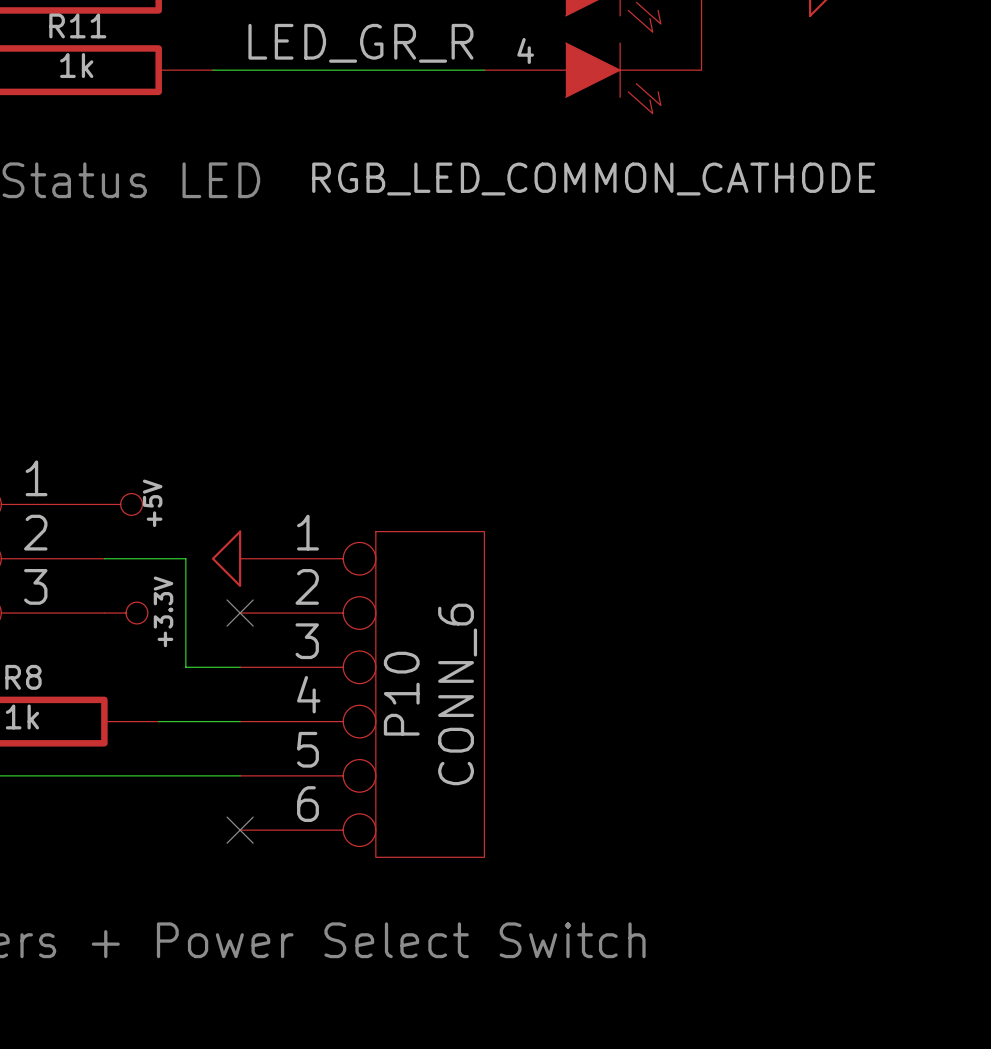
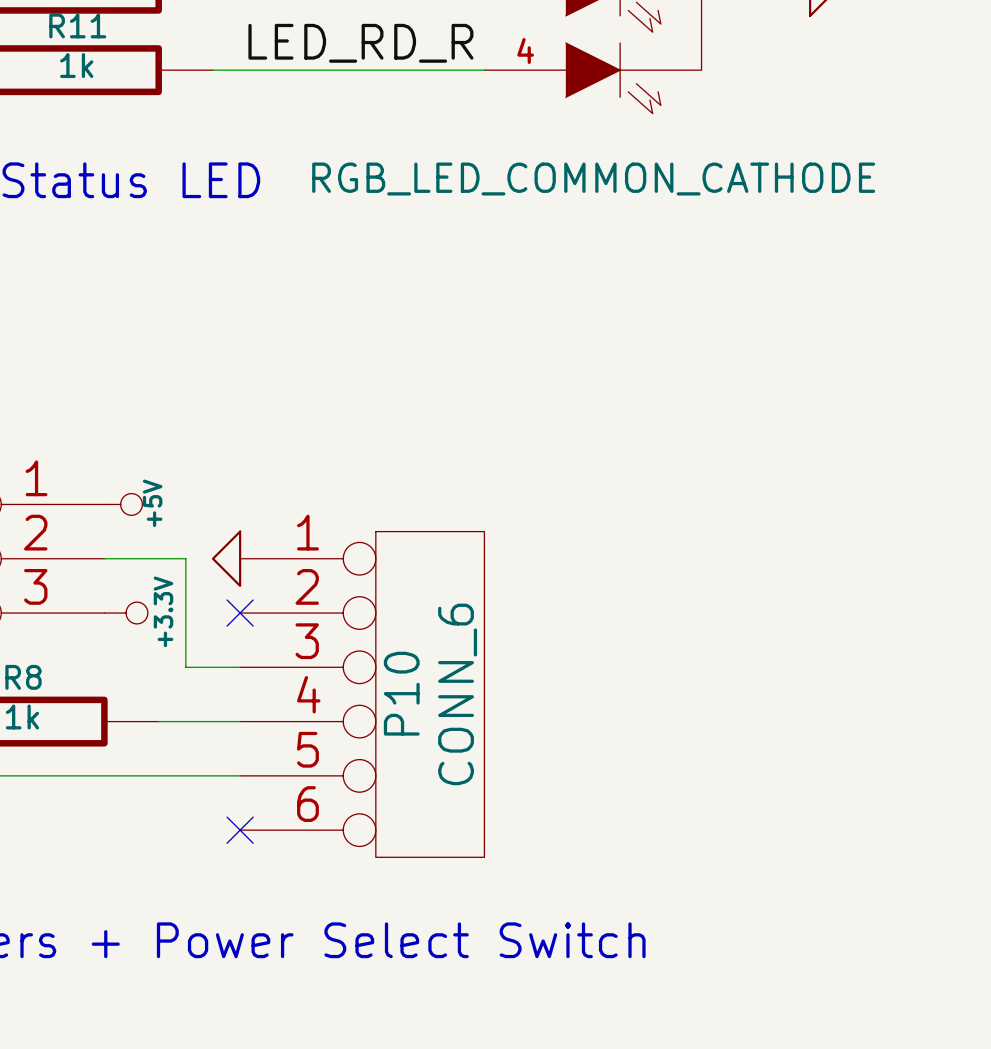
label: LED_GR_R (360, 43) -> LED_RD_R (360, 43)

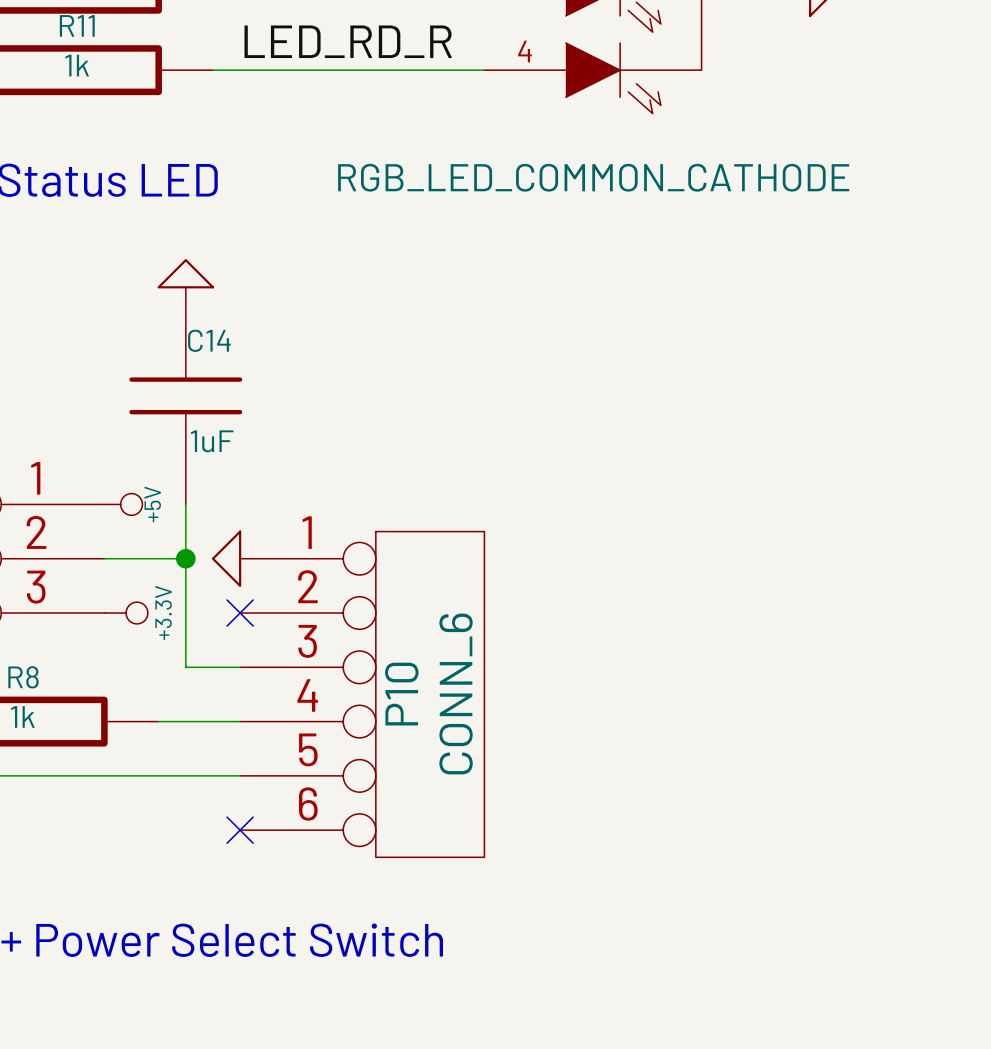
power symbol: none -> (185, 273)
C14: none -> 1uF (185, 395)
wire: none -> (185, 504) (185, 558)
junction: none -> (185, 558)

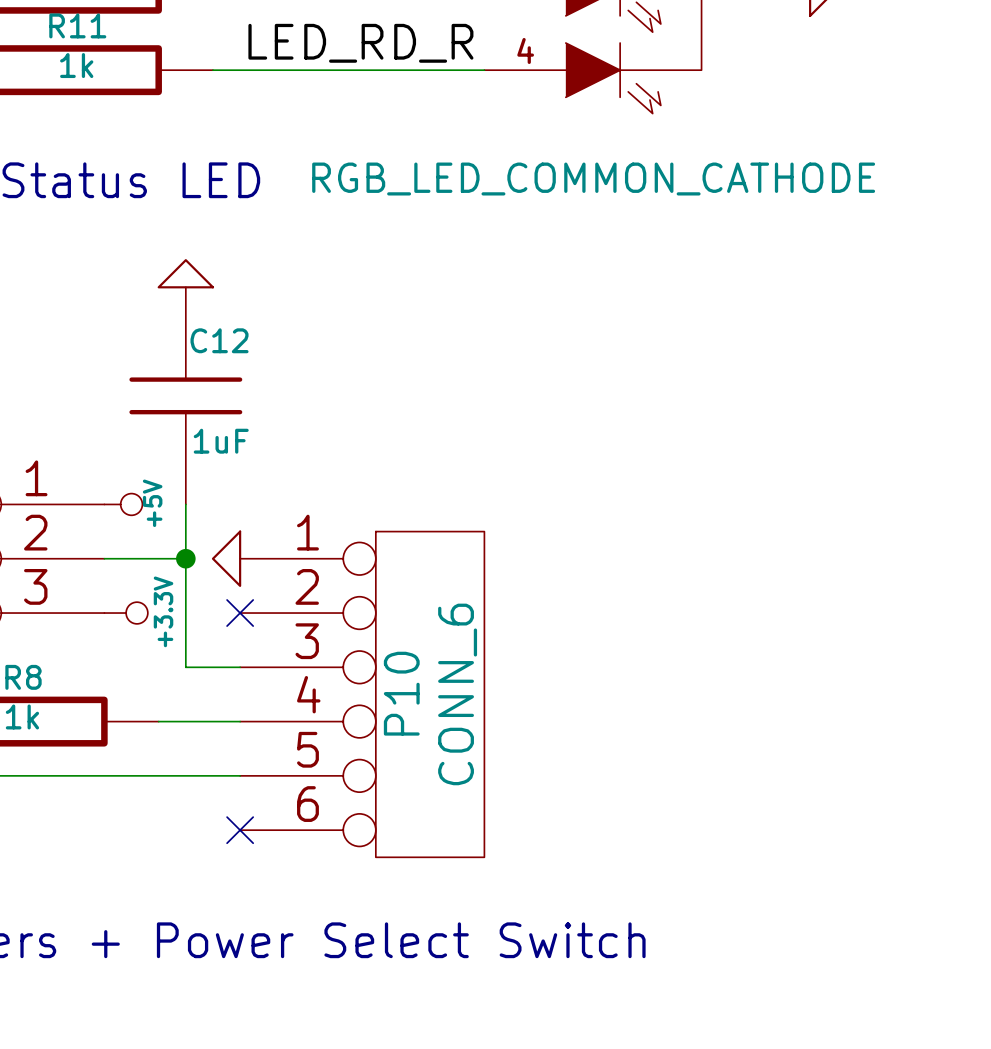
C14 name: C14 (209, 340) -> C12 (219, 340)

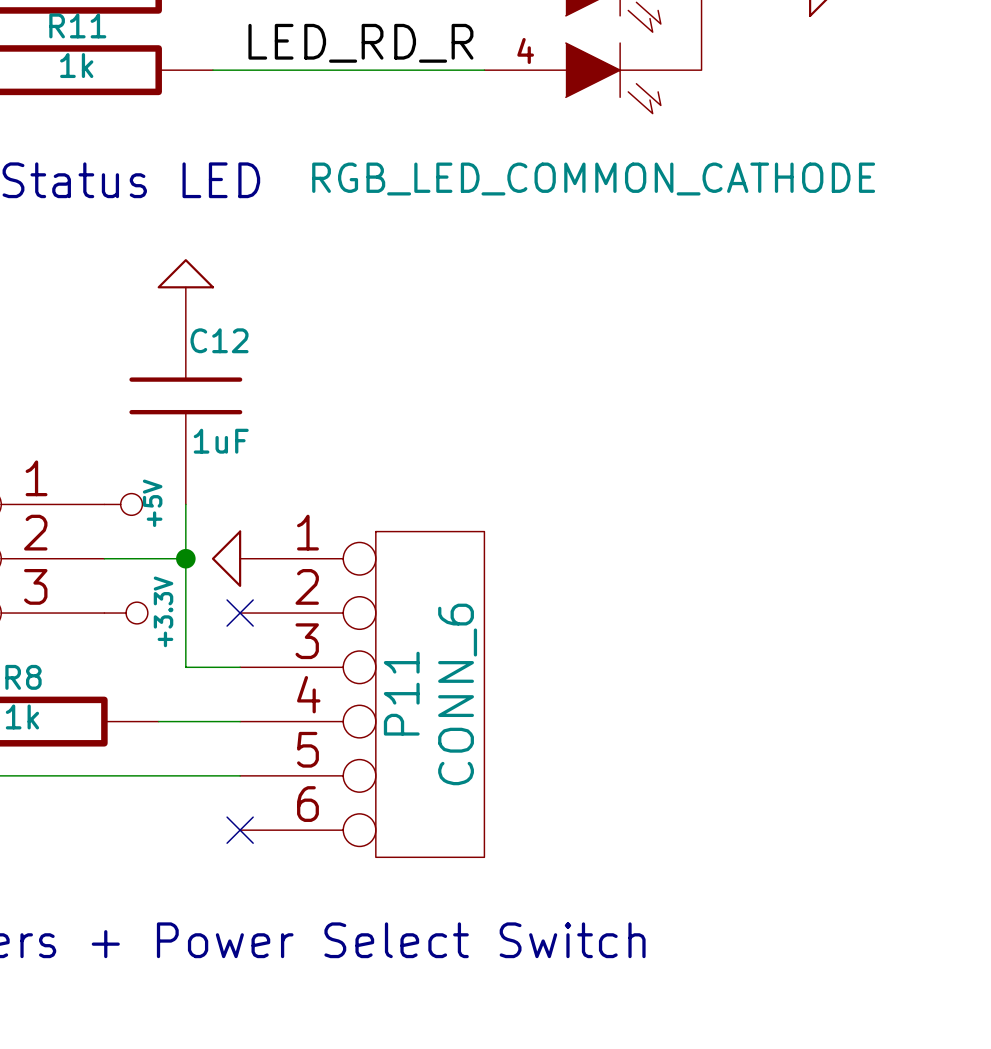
P10 name: P10 (401, 693) -> P11 (401, 693)

